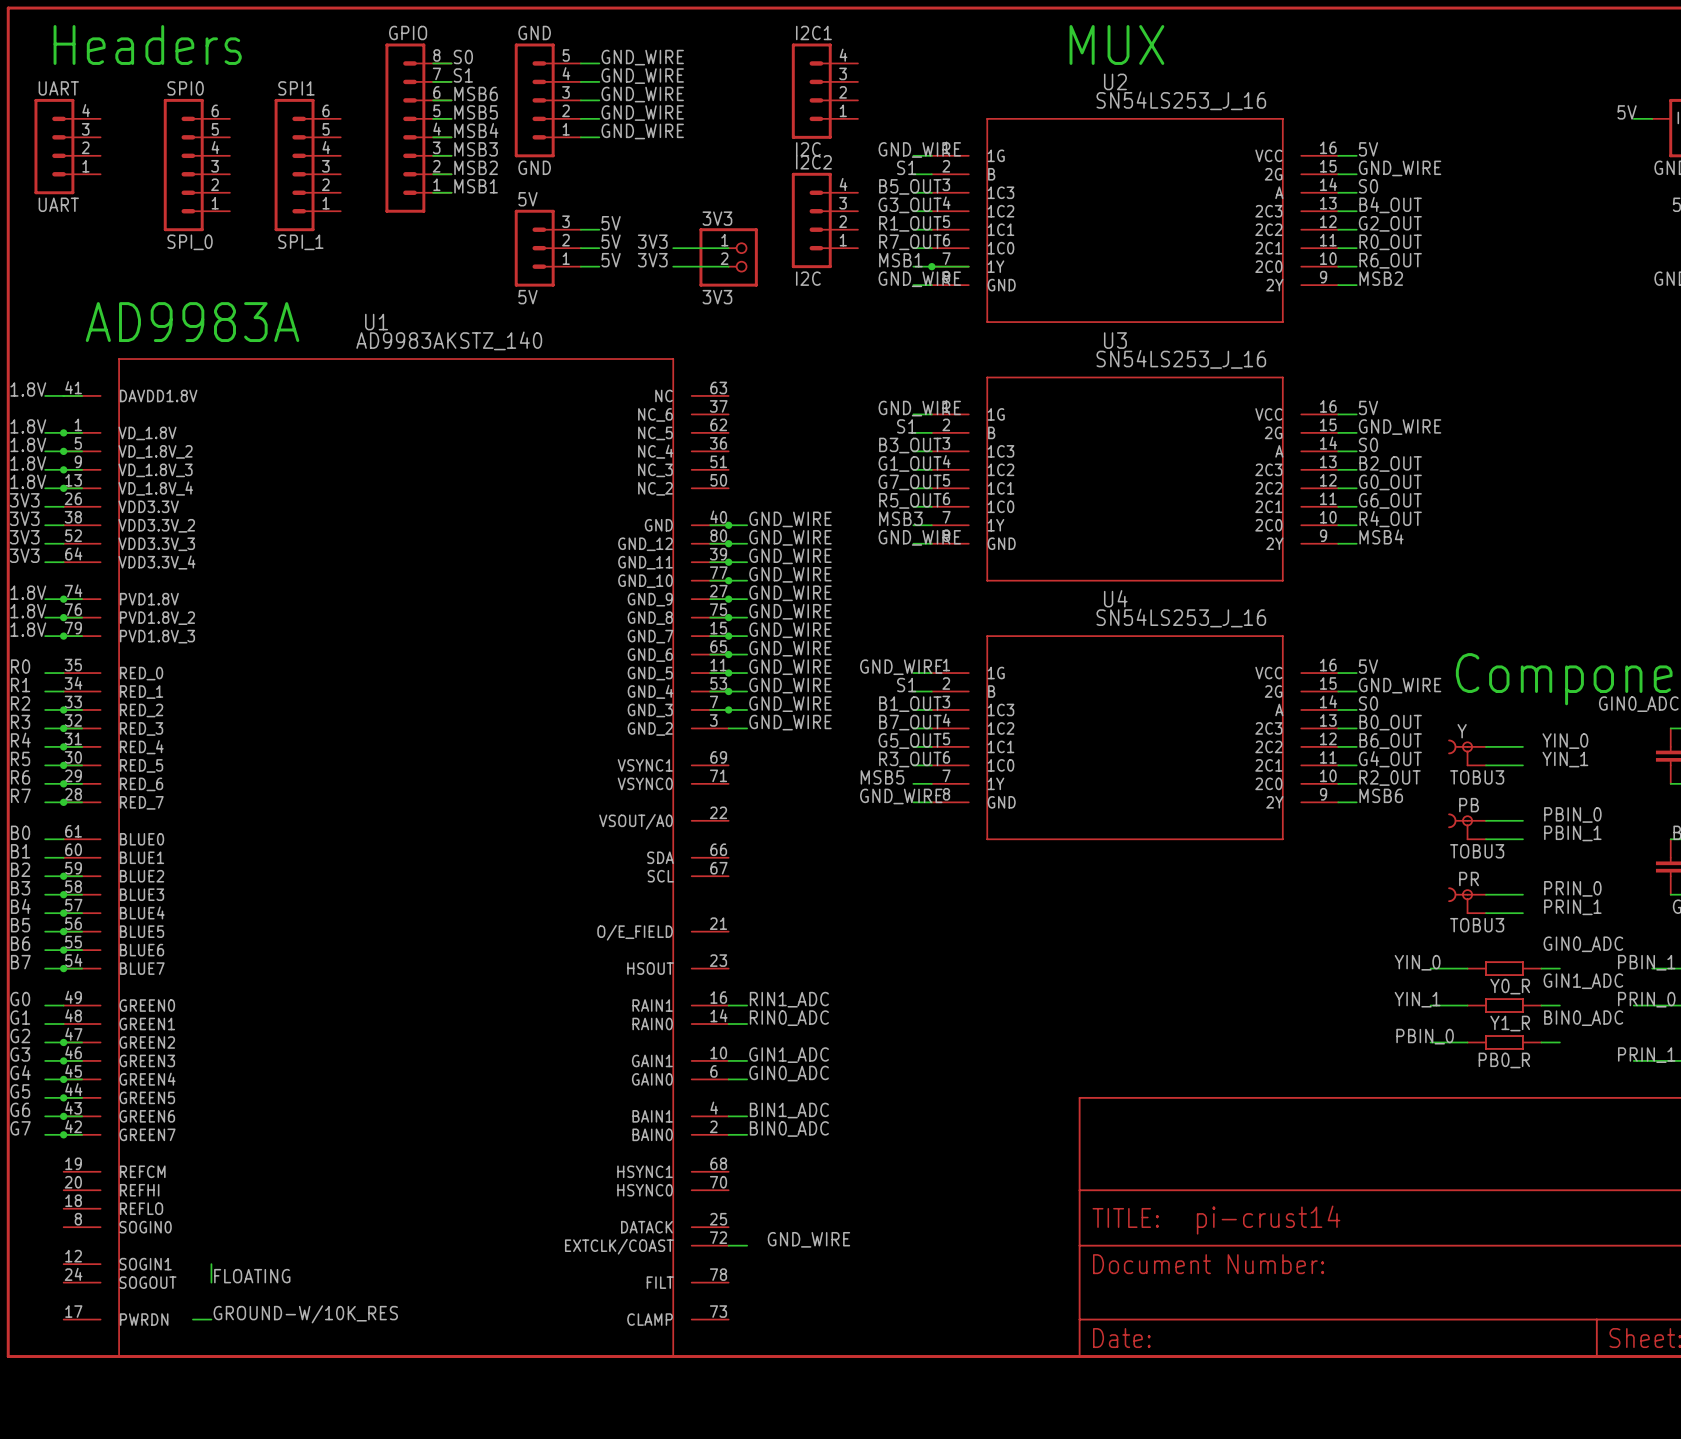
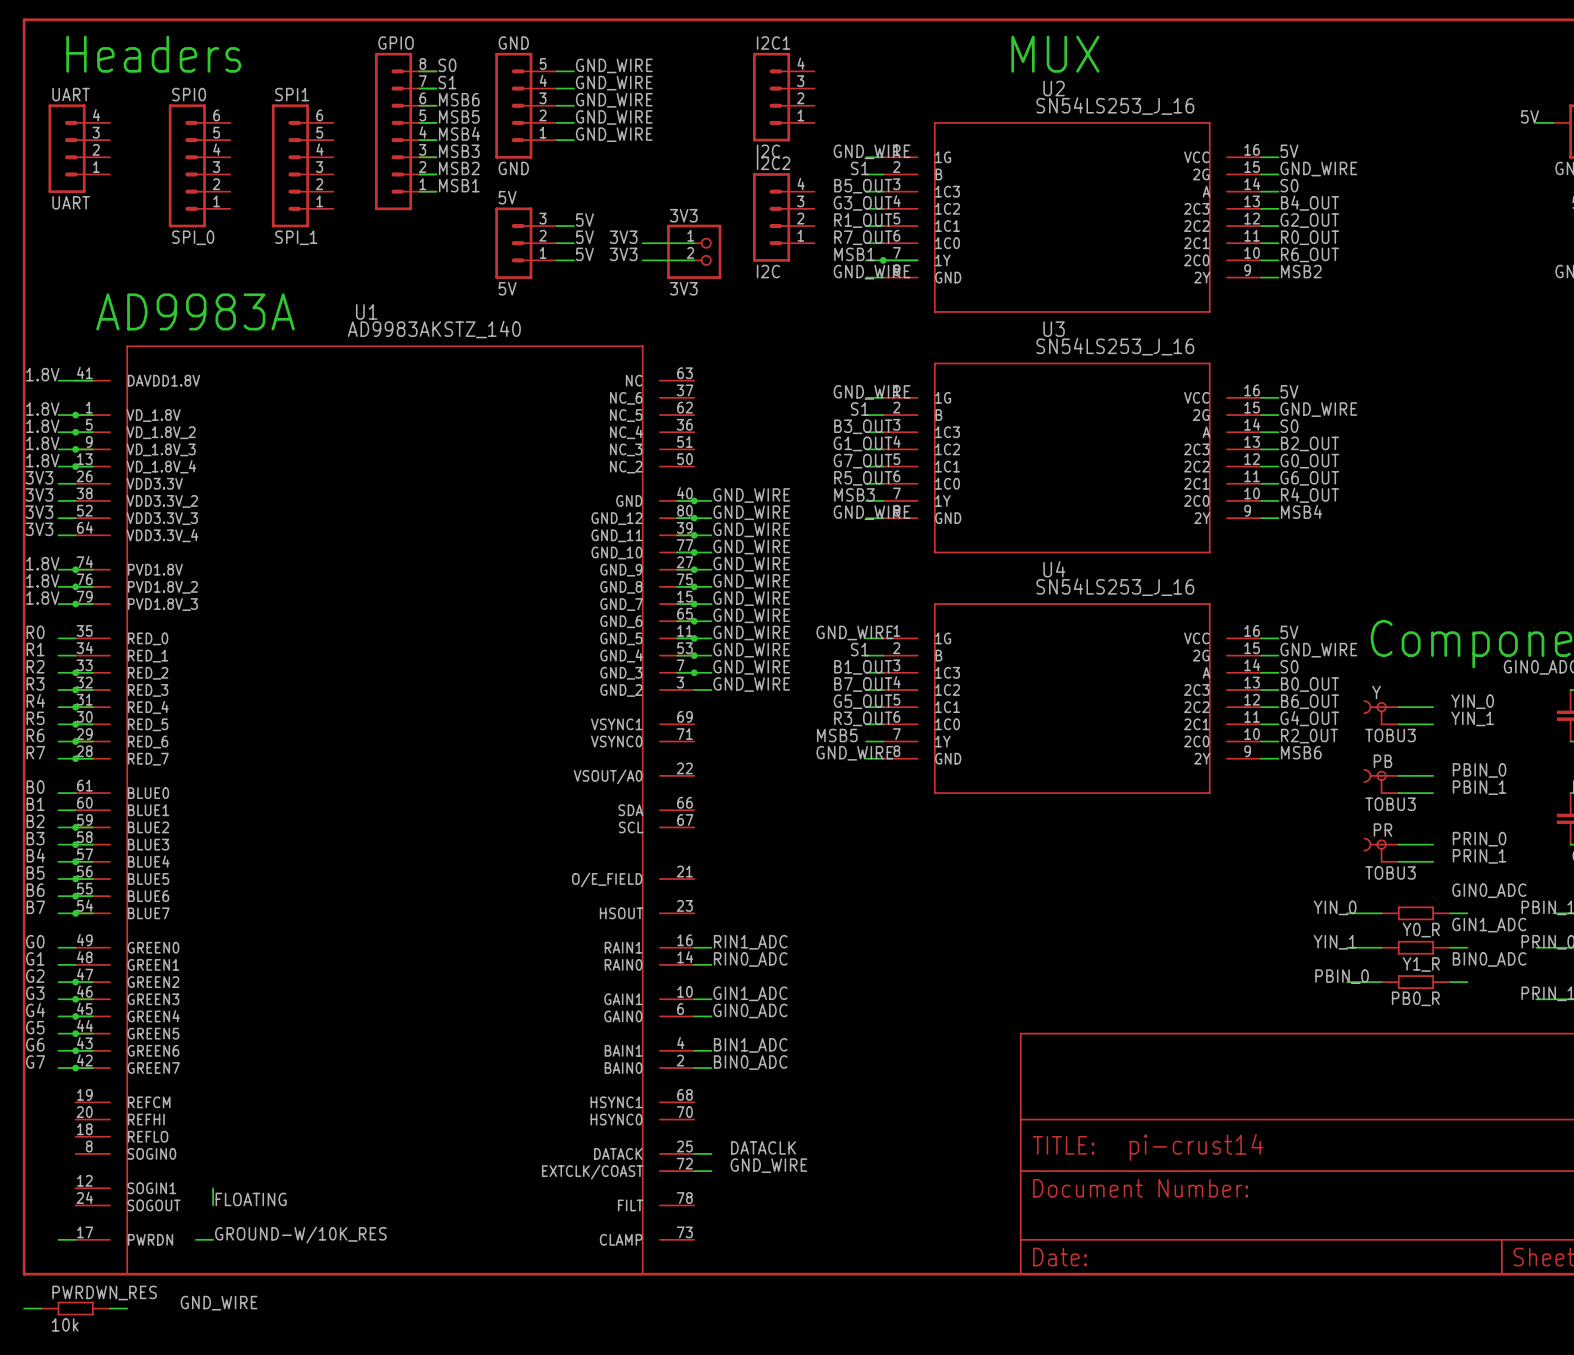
label: none -> DATACLK (763, 1147)
wire: none -> (694, 1153) (711, 1153)
wire: none -> (58, 1239) (75, 1239)
label: none -> GND_WIRE (219, 1303)
wire: none -> (24, 1308) (41, 1308)
PWRDWN_RES: none -> 10k (75, 1308)
wire: none -> (110, 1308) (127, 1308)

